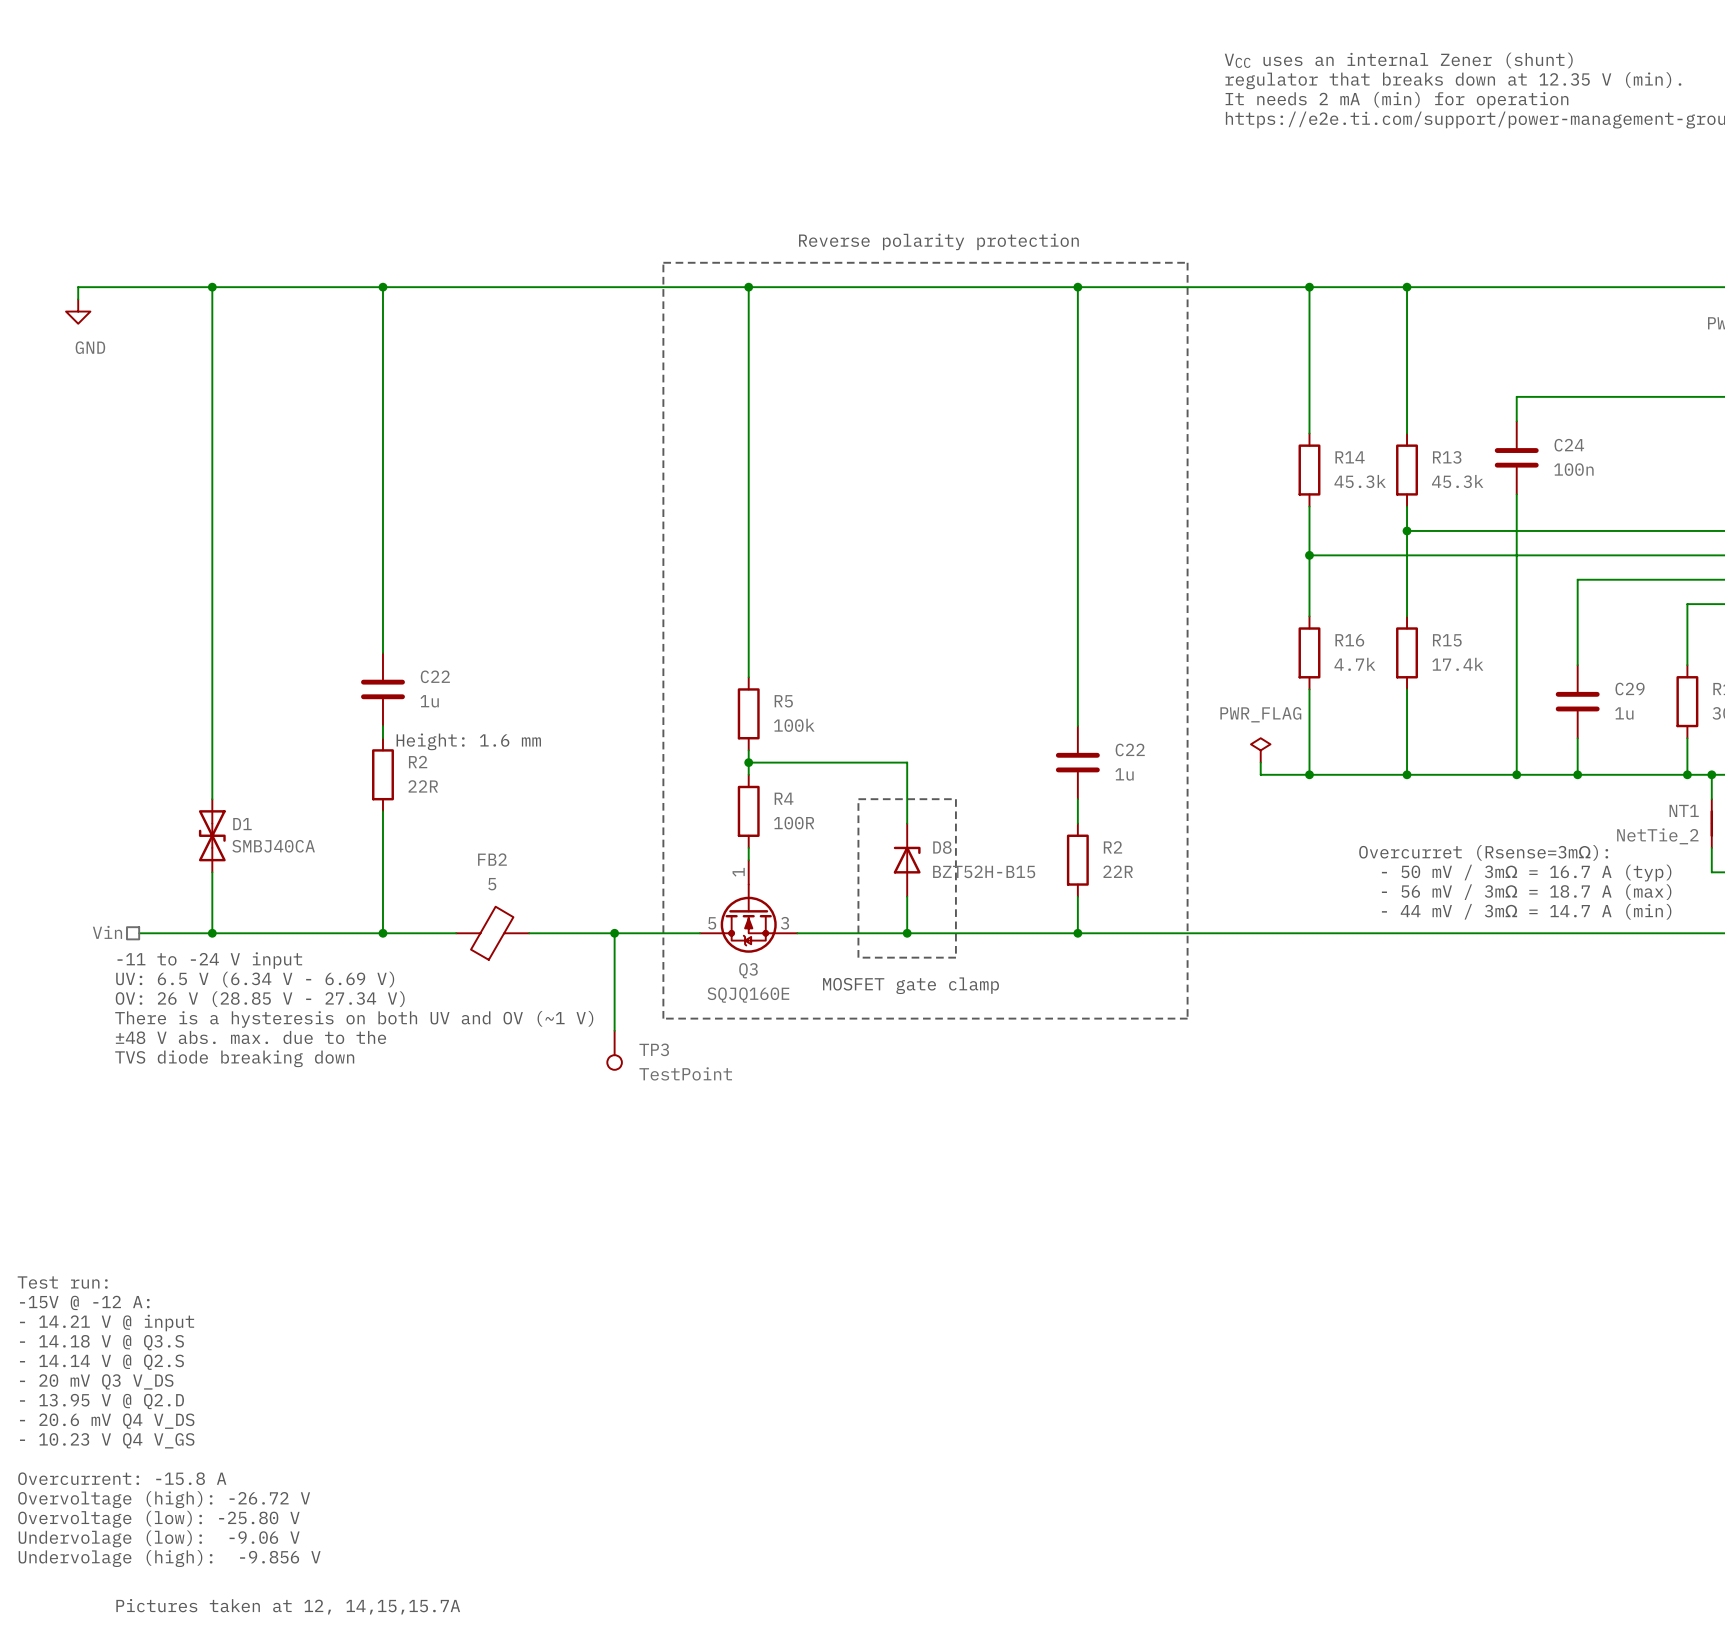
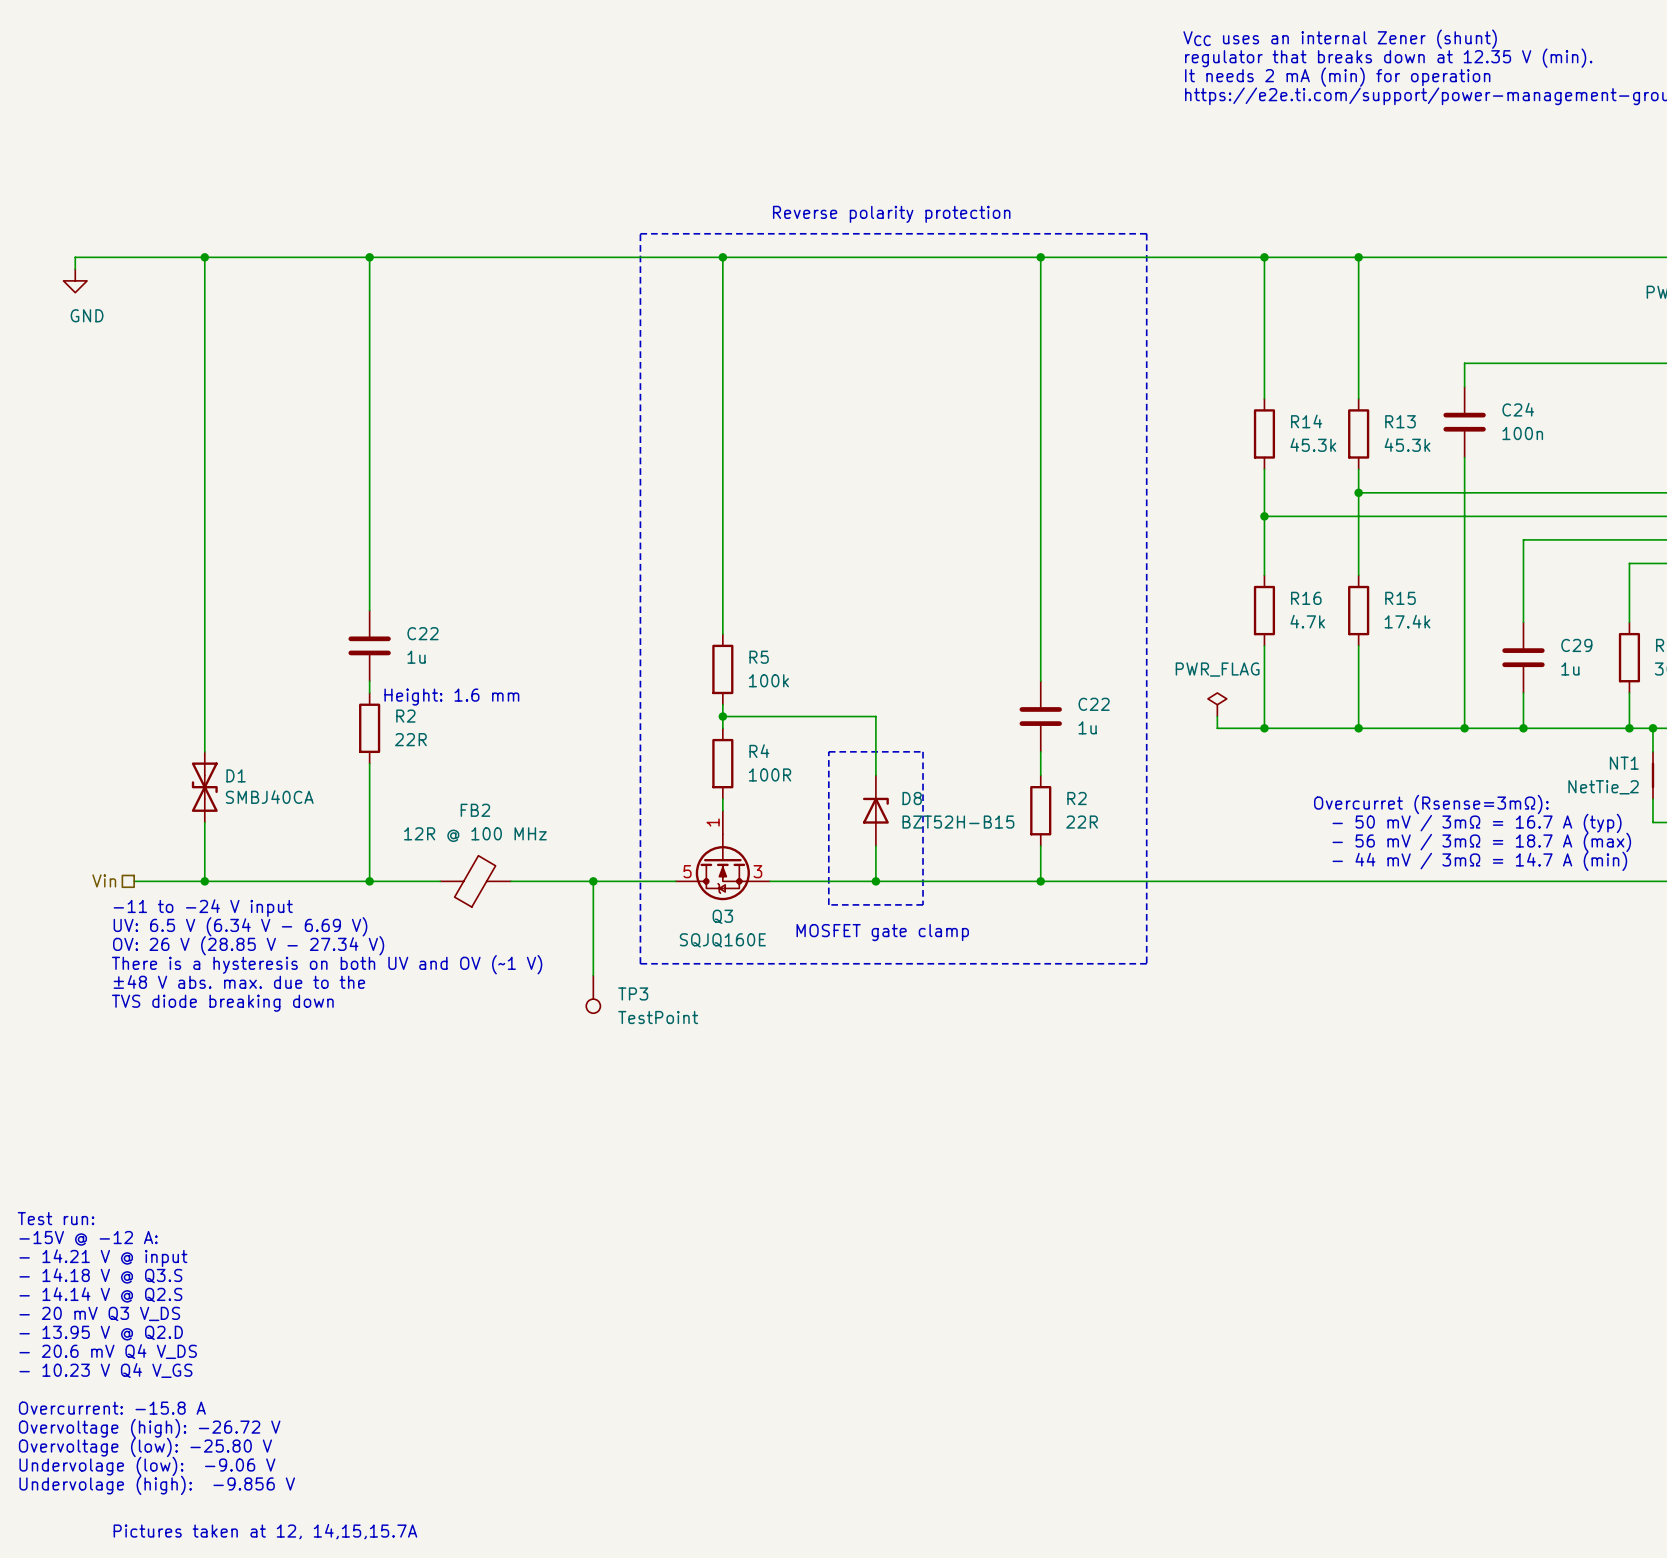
FB2 value: 5 (492, 884) -> 12R @ 100 MHz (475, 834)

